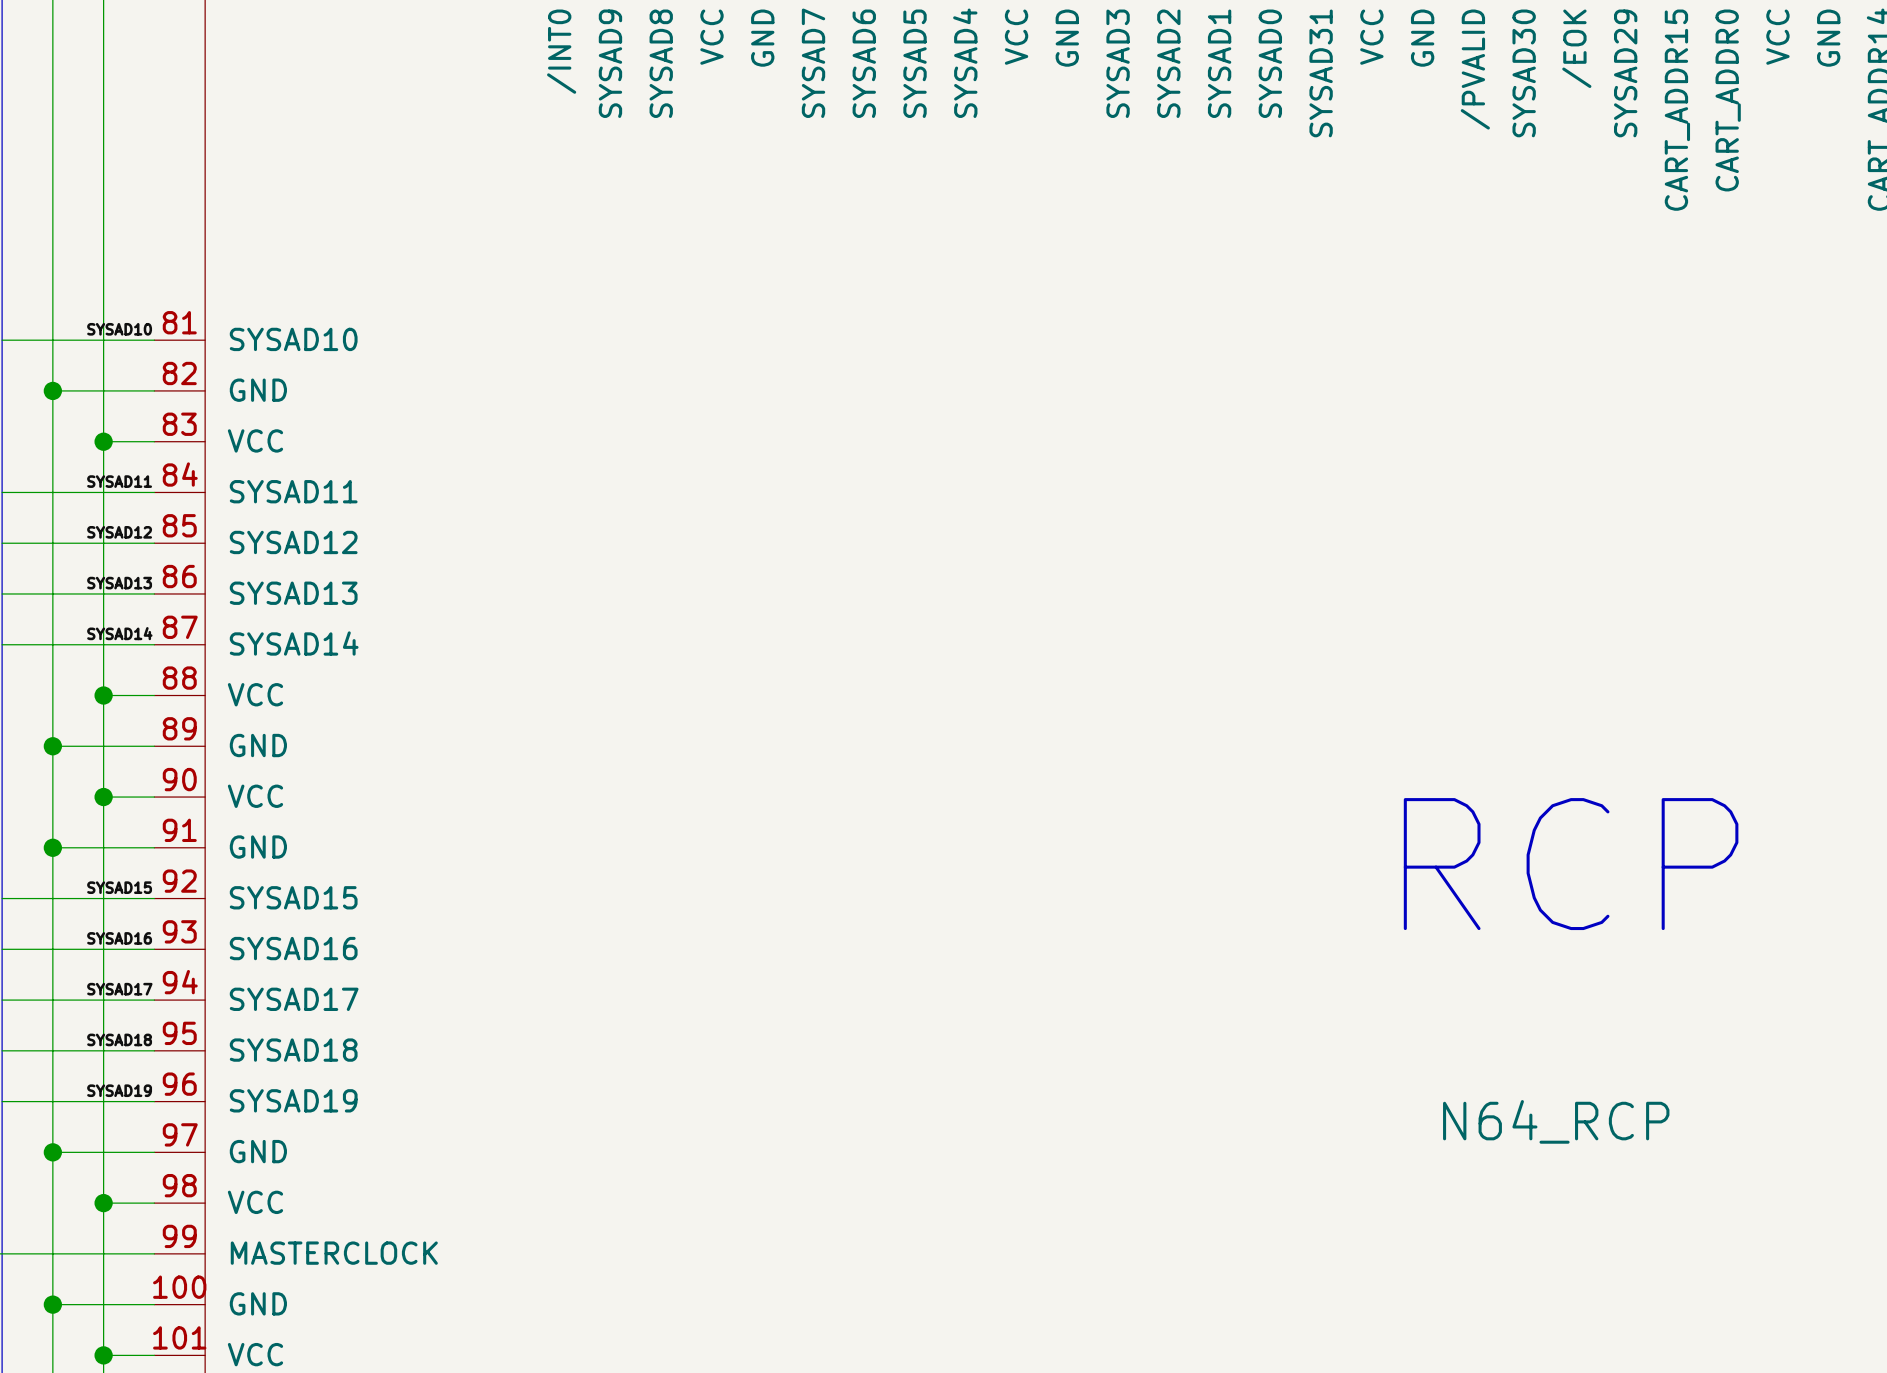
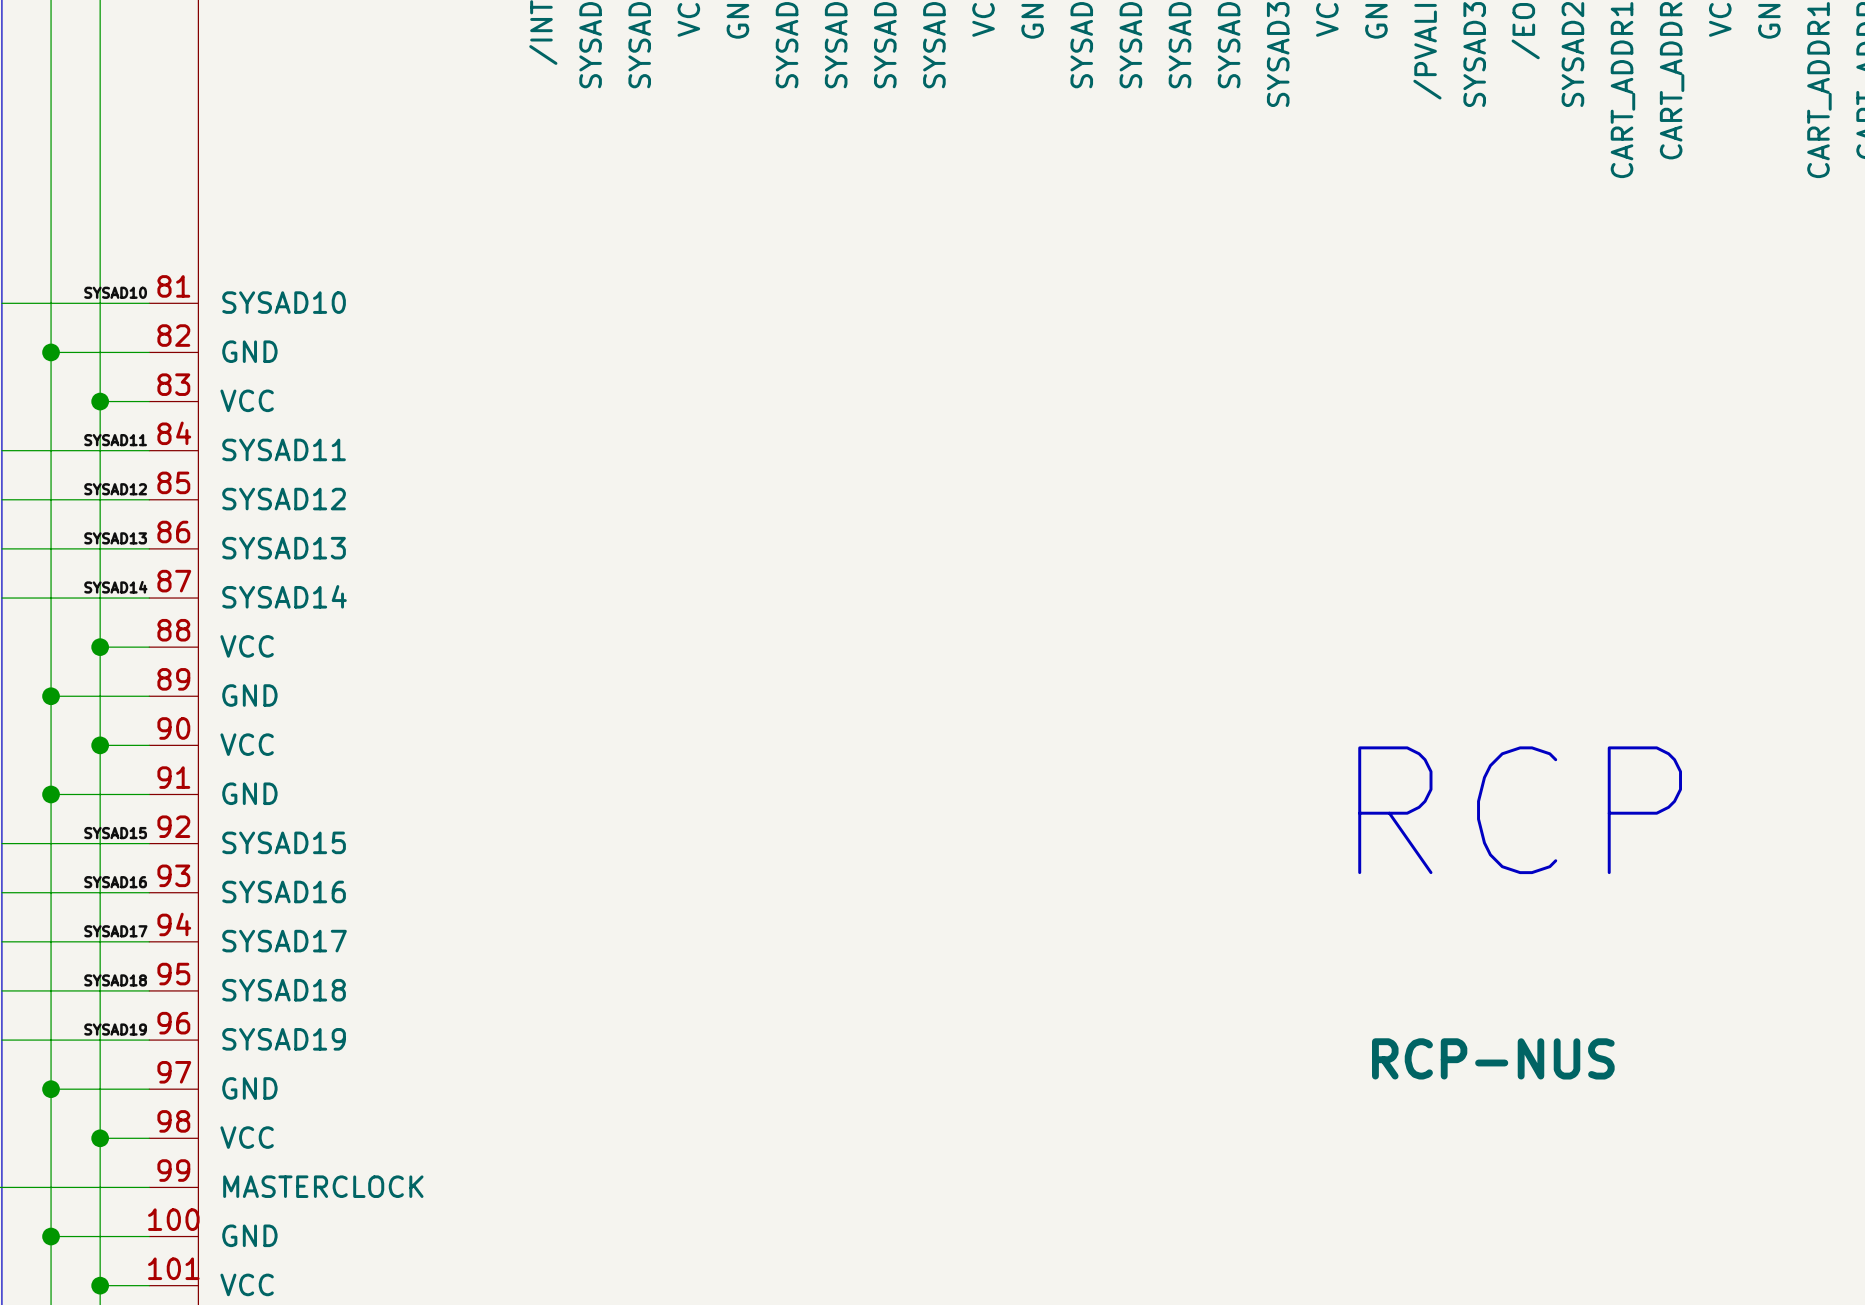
part value: N64_RCP (1556, 1121) -> RCP-NUS (1493, 1058)

